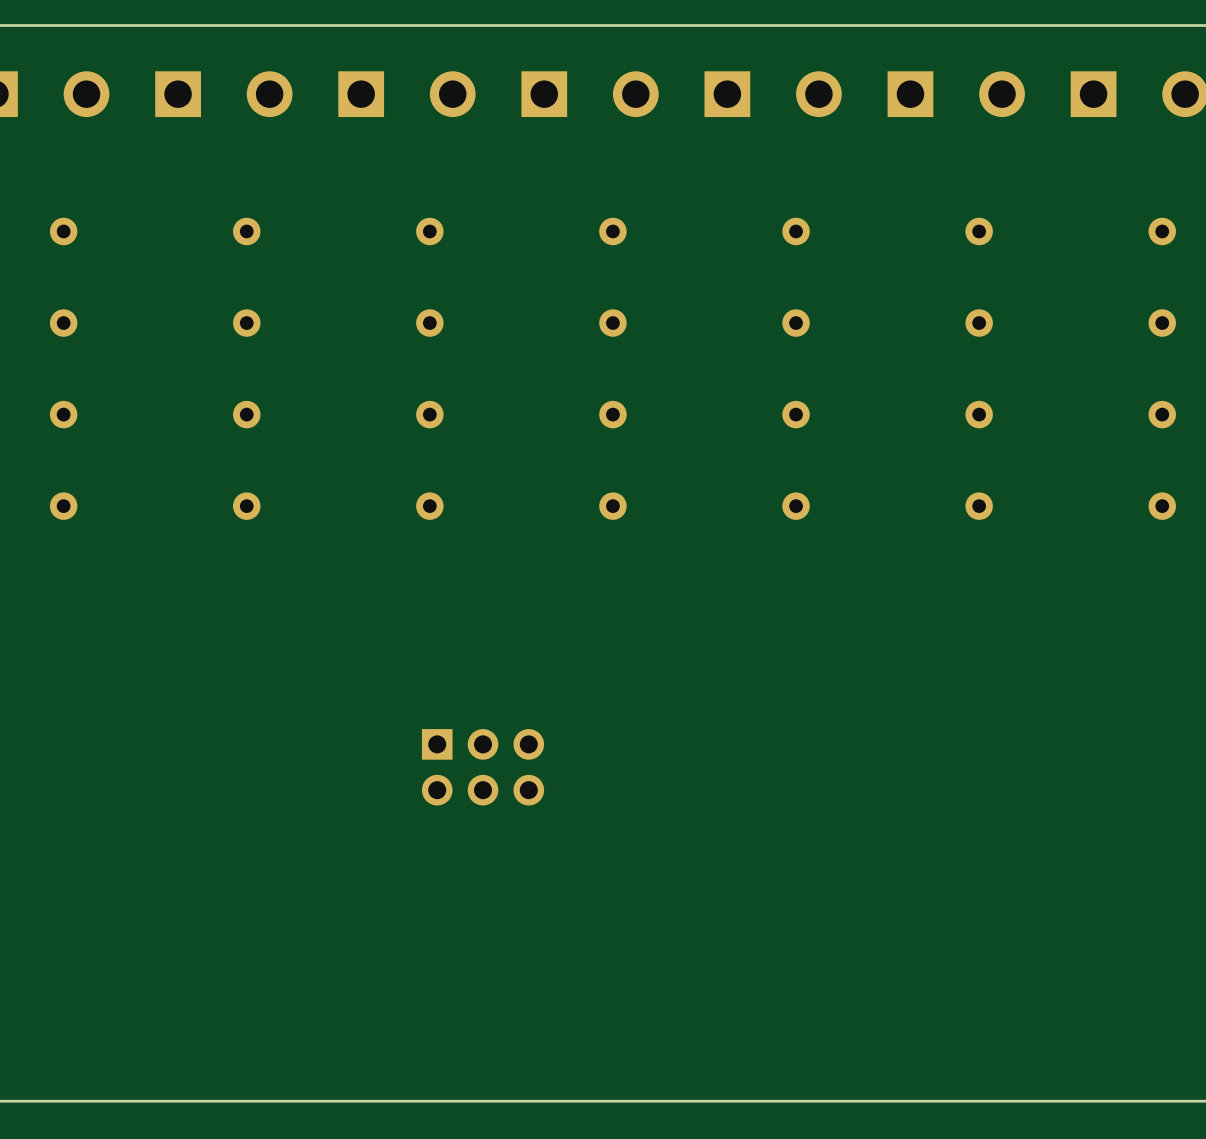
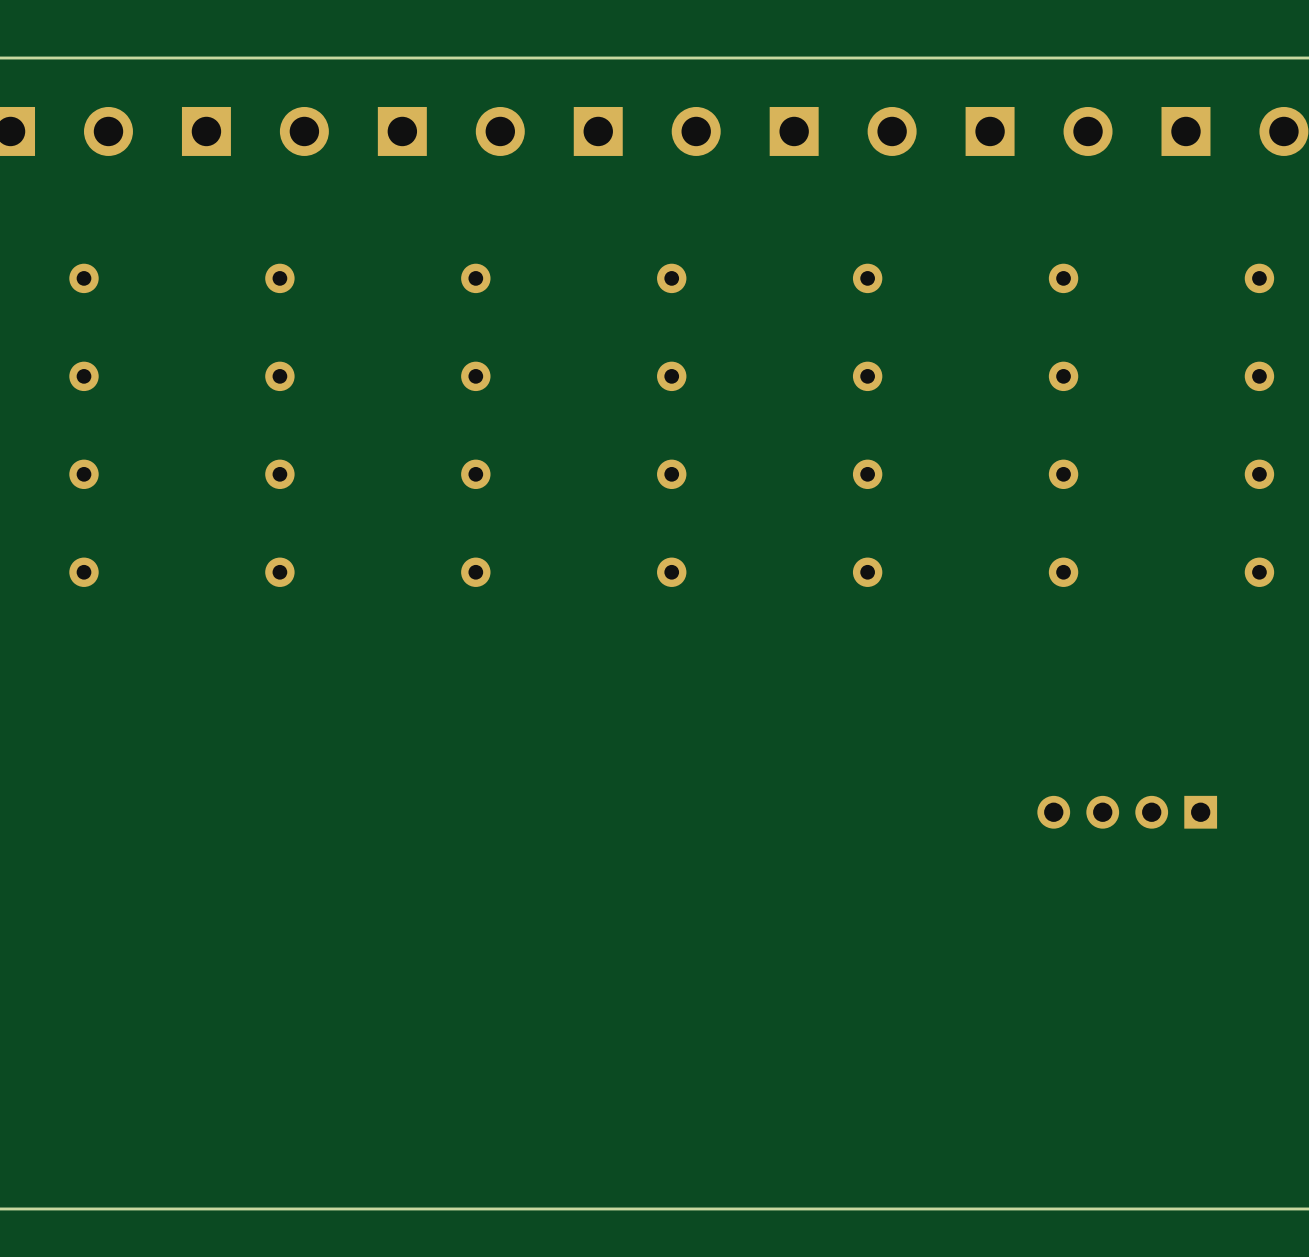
part: none -> (1127, 812)
part: (483, 767) -> none

